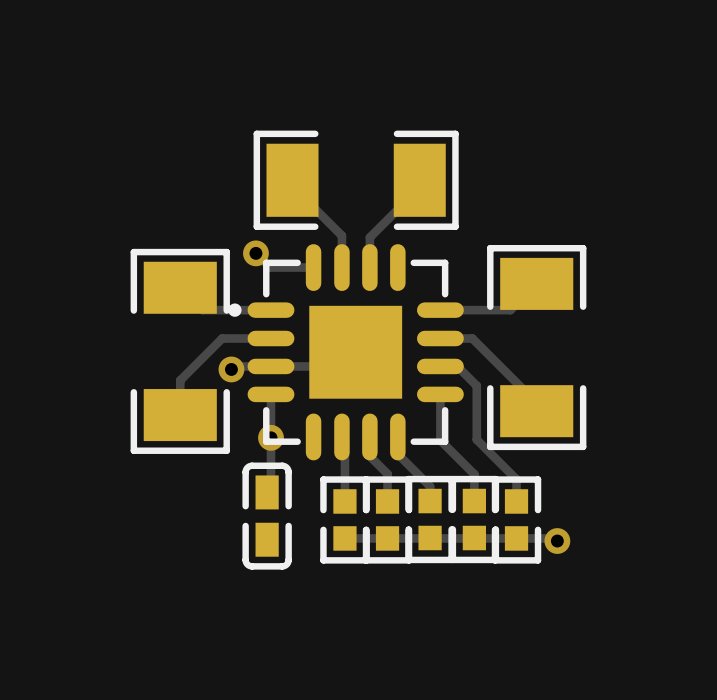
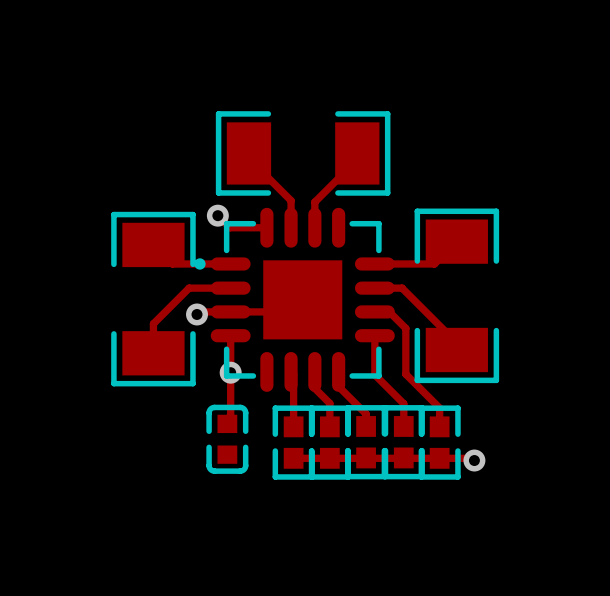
part footprint: [242, 462, 292, 570] -> [206, 404, 249, 474]

